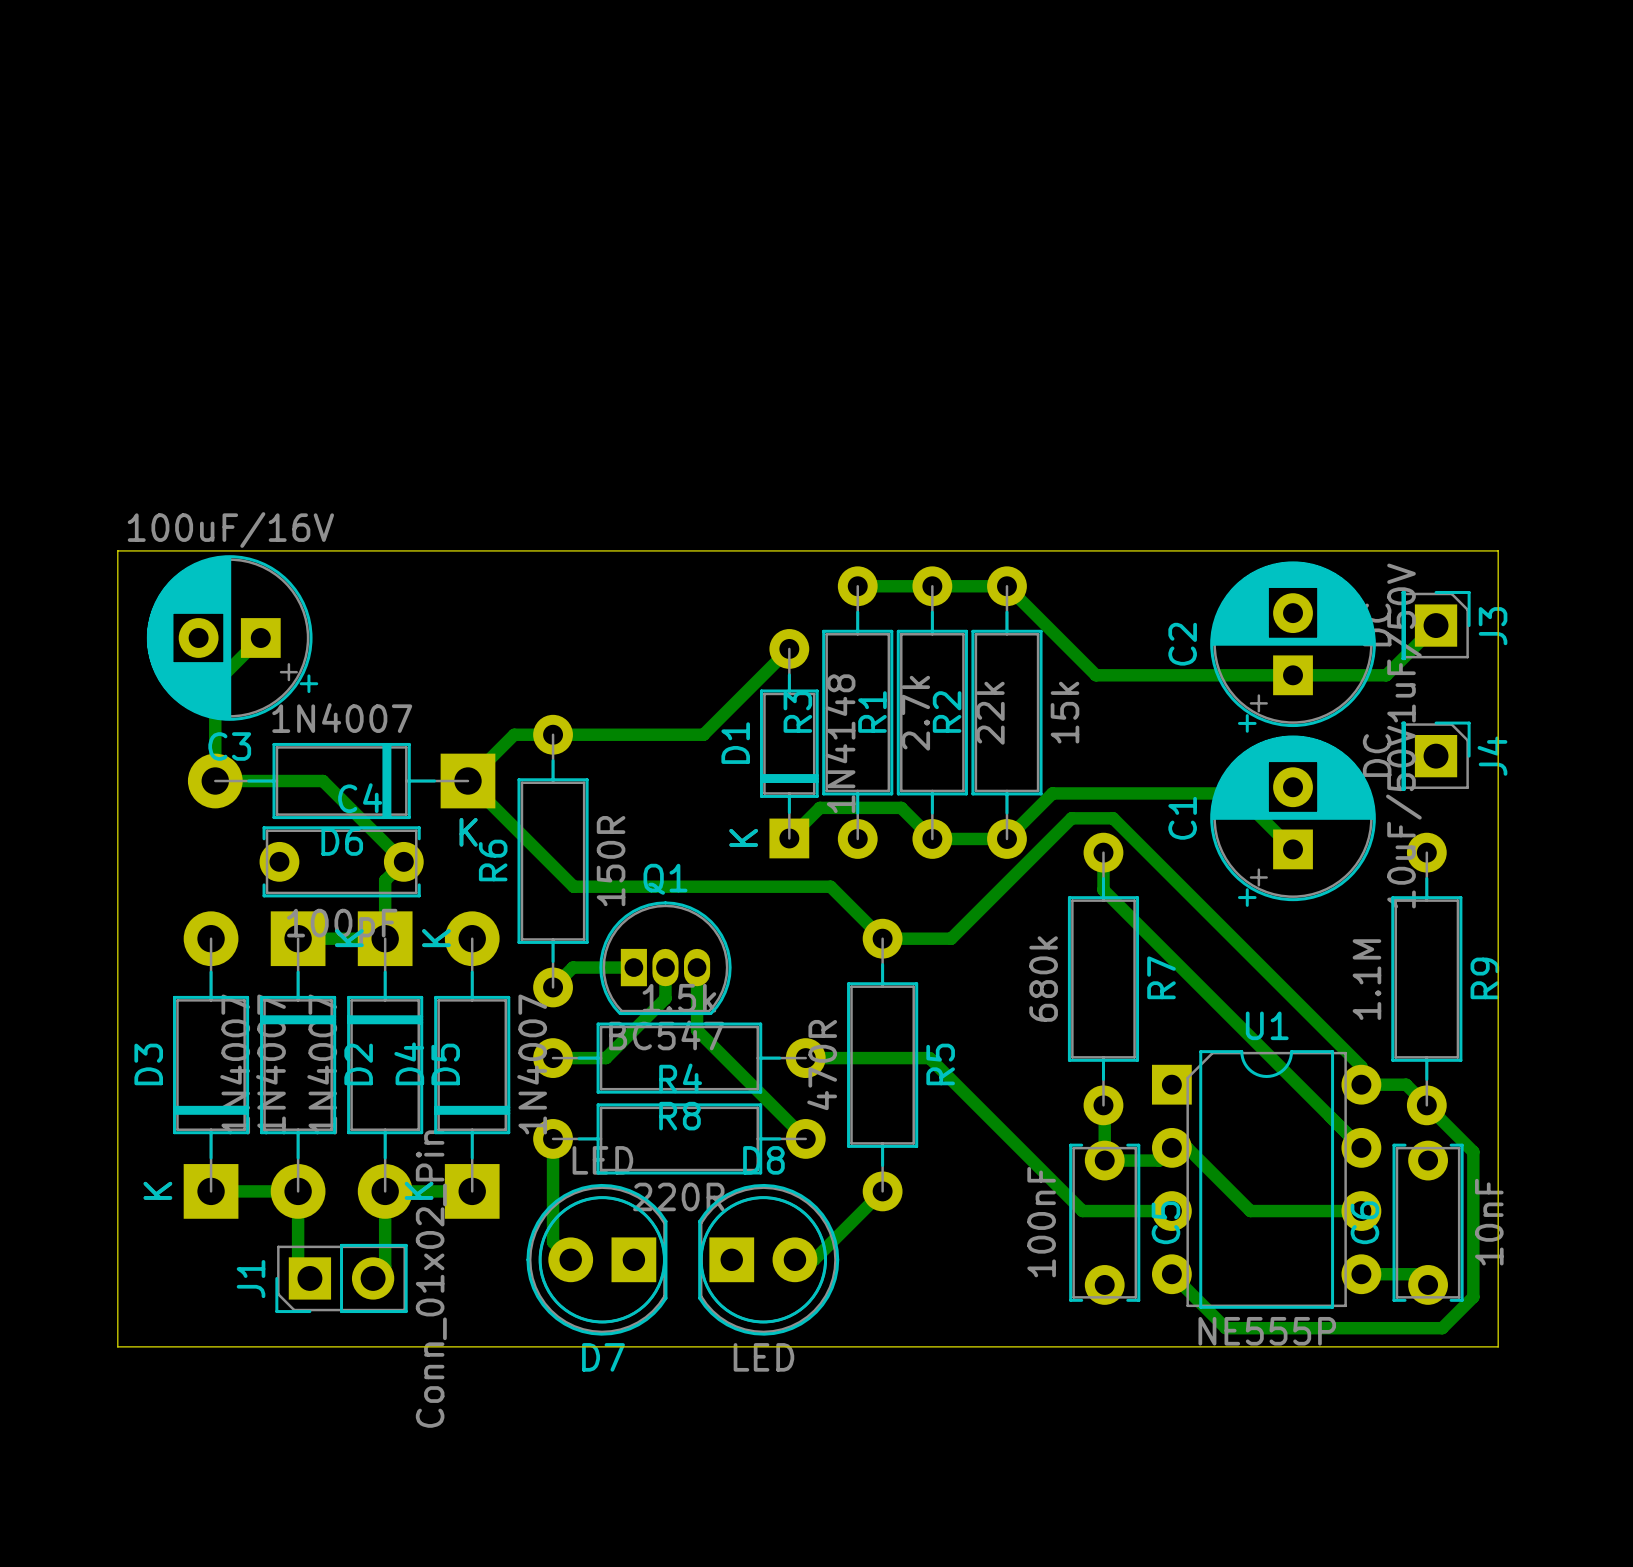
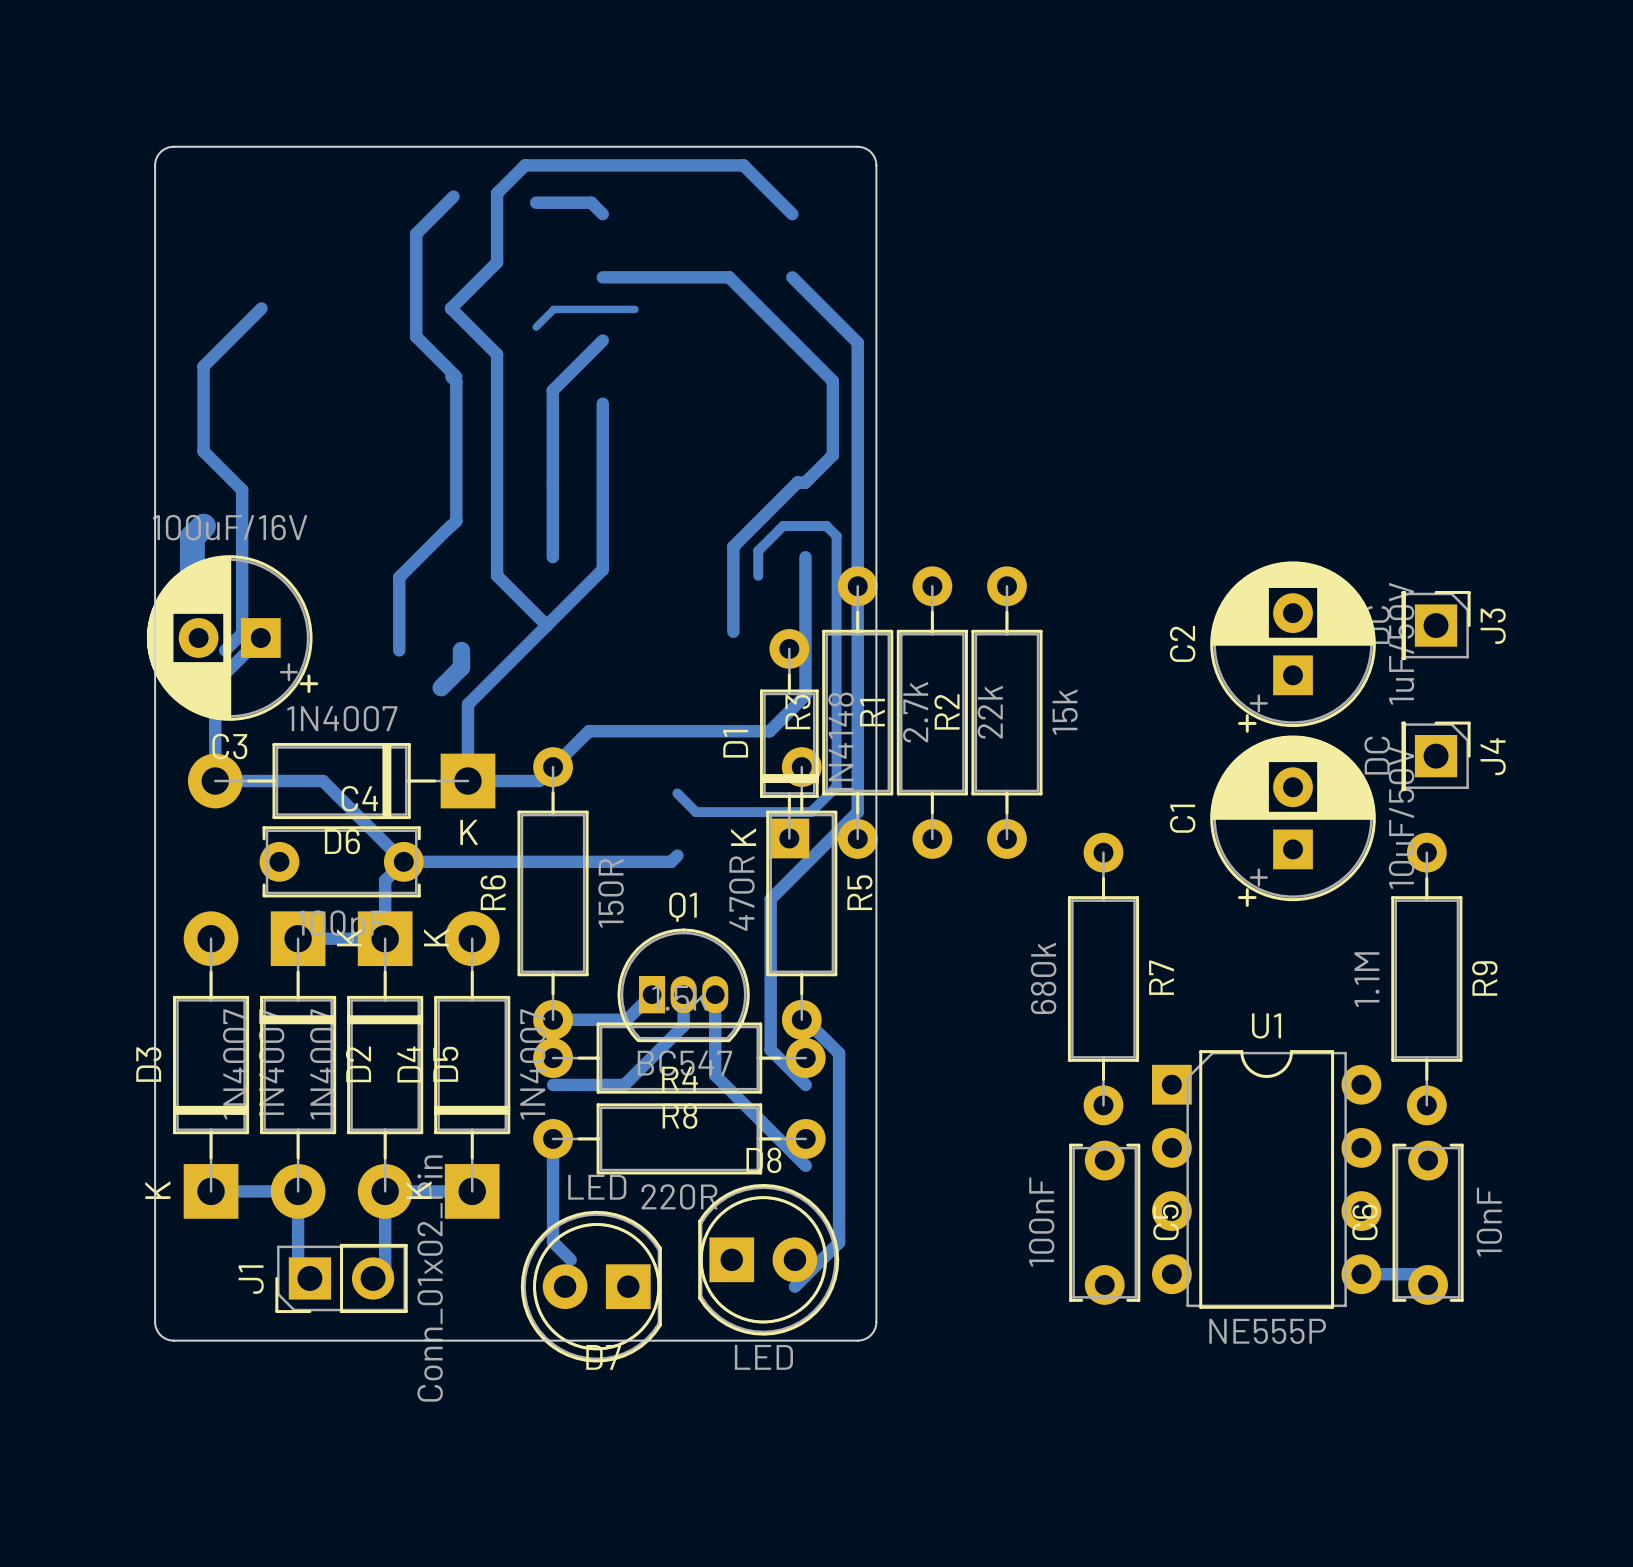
board edge: none -> (173, 146) (857, 146) (867, 149) (873, 156) (876, 165) (876, 1321) (873, 1331) (867, 1338) (857, 1340) (173, 1340) (164, 1338) (157, 1331) (155, 1321) (155, 165) (160, 152) (173, 146)
bottom track: none -> (453, 196) (416, 233) (416, 336) (456, 376)
bottom track: none -> (536, 202) (591, 202) (602, 214)
bottom track: none -> (792, 214) (743, 165) (525, 165) (497, 193) (497, 262) (451, 308) (497, 354) (497, 575) (546, 625)
bottom track: none -> (602, 277) (729, 277) (832, 381) (832, 455) (805, 482) (797, 482) (733, 546) (733, 631)
bottom track: none -> (792, 277) (857, 342) (857, 812) (770, 899) (770, 1049) (805, 1084)
bottom track: none -> (261, 308) (203, 366) (203, 451) (242, 490) (242, 633) (225, 650)
bottom track: none -> (634, 309) (553, 309) (536, 327)
bottom track: none -> (602, 340) (552, 390) (552, 557)
bottom track: none -> (451, 376) (456, 381) (456, 521) (451, 526)
bottom track: none -> (602, 403) (602, 569) (467, 704) (467, 781) (539, 781) (588, 731) (769, 731) (805, 695) (805, 557)
bottom track: none -> (203, 526) (192, 537) (192, 594)
bottom track: none -> (450, 526) (399, 577) (399, 650)
board edge: (117, 550) (1498, 550) (1498, 1346) (117, 1346) (117, 550) -> none
bottom track: none -> (758, 575) (758, 550) (783, 526) (826, 526) (836, 536) (836, 786) (811, 812) (696, 812) (677, 793)
bottom track: (857, 586) (1006, 586) (1096, 675) (1386, 675) (1436, 625) -> none
bottom track: (789, 648) (703, 734) (514, 734) (467, 781) (573, 886) (830, 886) (882, 938) (951, 938) (1071, 818) (1113, 818) (1361, 1066) (1361, 1084) (1406, 1084) (1473, 1151) (1473, 1297) (1442, 1328) (1225, 1328) (1171, 1274) -> none
bottom track: none -> (461, 650) (461, 667) (441, 687)
bottom track: (789, 838) (819, 807) (901, 807) (932, 838) (1006, 838) (1052, 793) (1237, 793) (1293, 849) -> none
bottom track: (1103, 852) (1103, 889) (1361, 1147) -> none
bottom track: none -> (677, 855) (671, 861) (403, 861)
R6 position: (553, 861) -> (553, 893)
Q1 position: (665, 958) -> (683, 985)
bottom track: (633, 967) (572, 967) (553, 987) -> none
bottom track: (665, 967) (665, 998) (606, 1058) (553, 1058) -> none
bottom track: (697, 967) (697, 1030) (805, 1138) -> none
bottom track: none -> (652, 994) (626, 1019) (553, 1019)
bottom track: none -> (683, 994) (683, 1025) (624, 1084) (553, 1084)
bottom track: none -> (715, 994) (715, 1075) (805, 1165)
bottom track: none -> (805, 1019) (839, 1053) (839, 1242) (794, 1286)
bottom track: (805, 1058) (929, 1058) (1082, 1211) (1171, 1211) (1166, 1216) -> none
R5 position: (882, 1065) -> (801, 893)
bottom track: (1103, 1105) (1104, 1160) (1159, 1160) (1171, 1147) (1187, 1147) (1250, 1211) (1361, 1211) -> none
bottom track: (882, 1191) (814, 1259) (794, 1259) -> none
D7 position: (596, 1259) -> (591, 1286)

